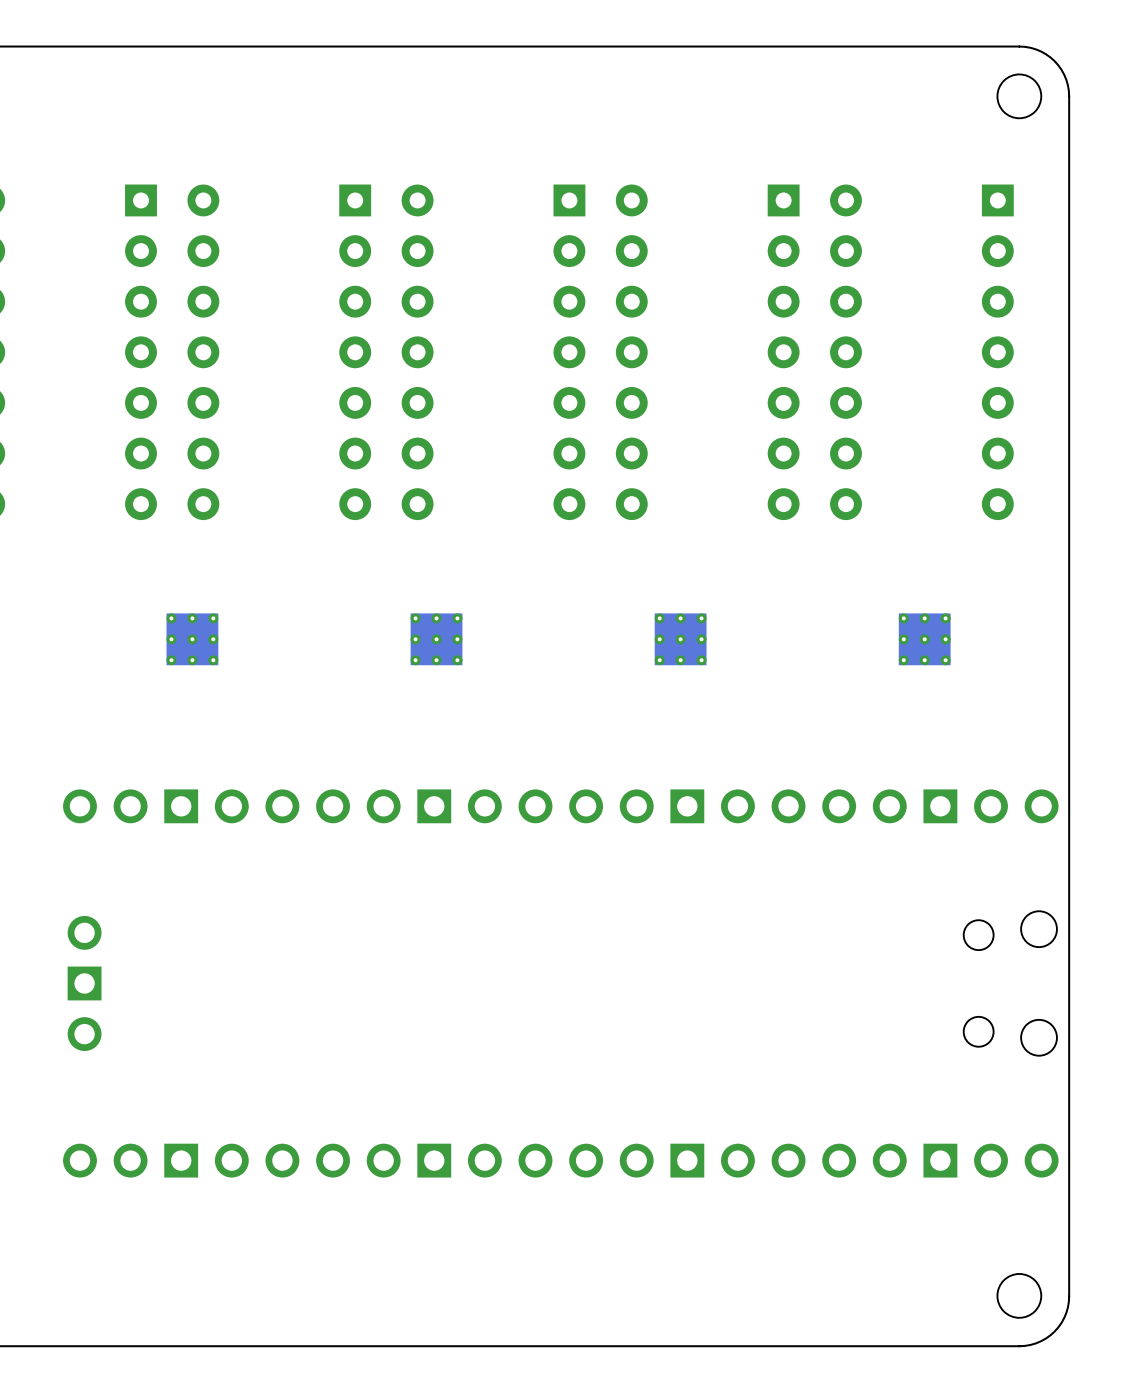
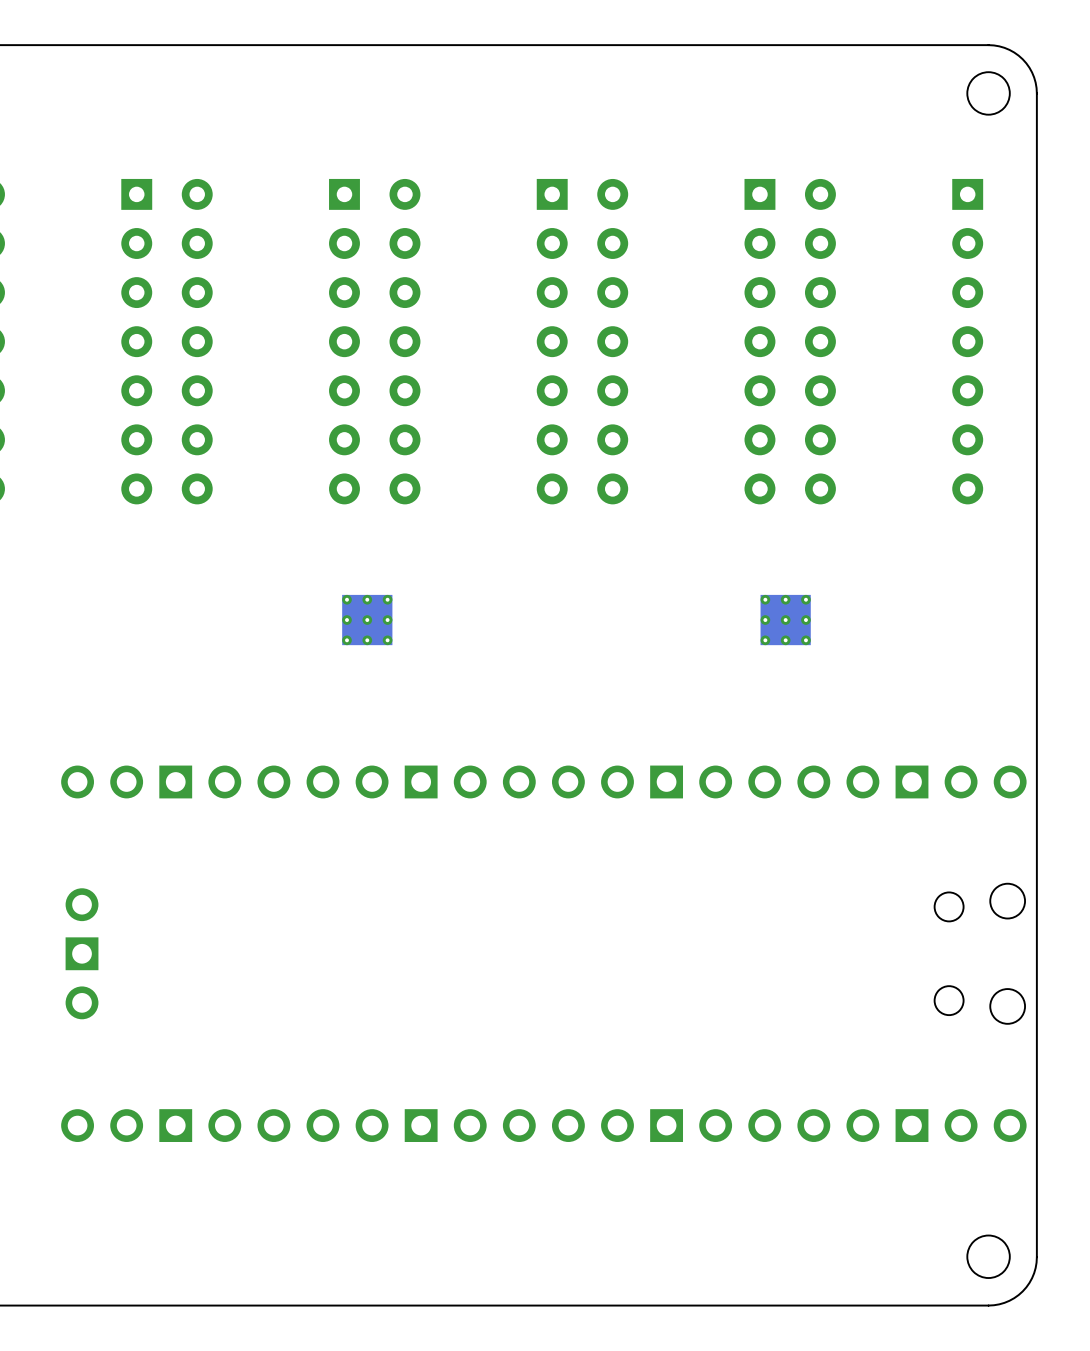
part: (192, 639) -> none
part position: (436, 639) -> (367, 620)
part: (680, 639) -> none
part: none -> (785, 620)
part: (924, 639) -> none

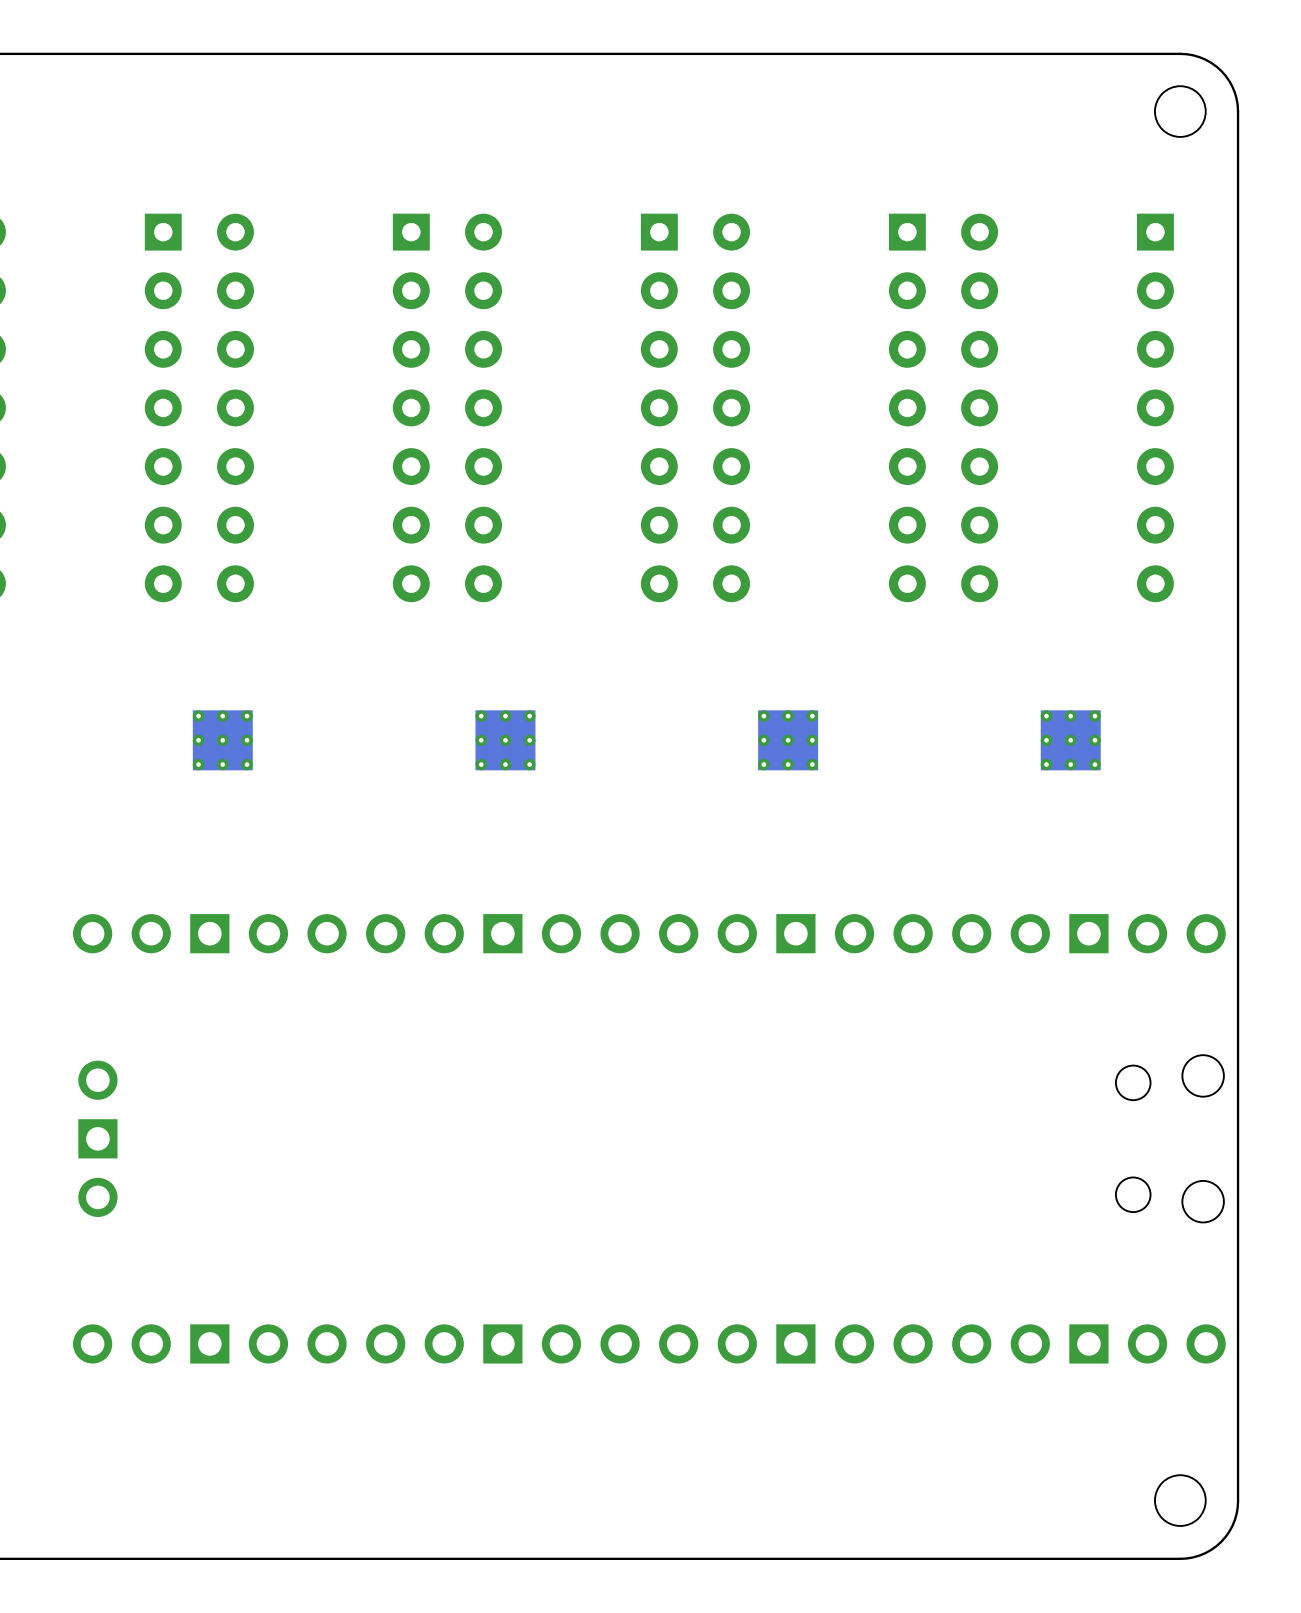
part: none -> (222, 740)
part position: (367, 620) -> (505, 740)
part: none -> (788, 740)
part: (785, 620) -> none
part: none -> (1070, 740)

